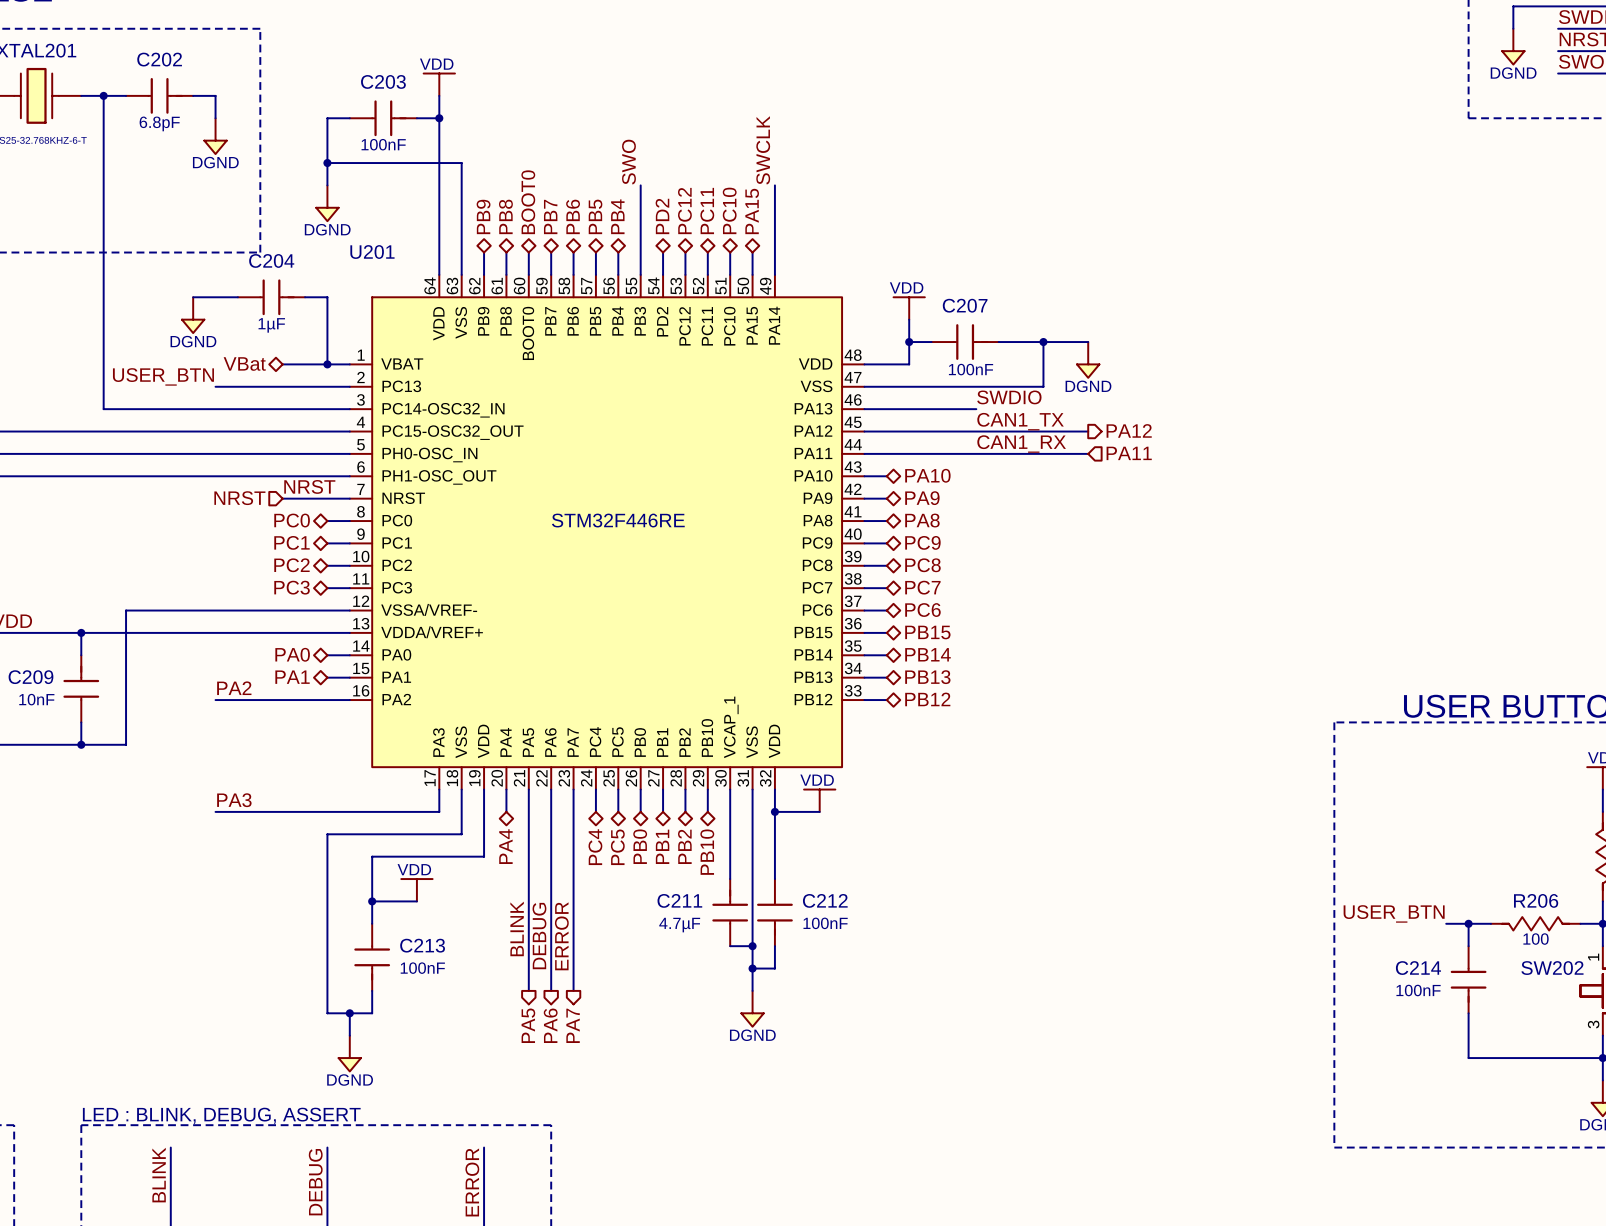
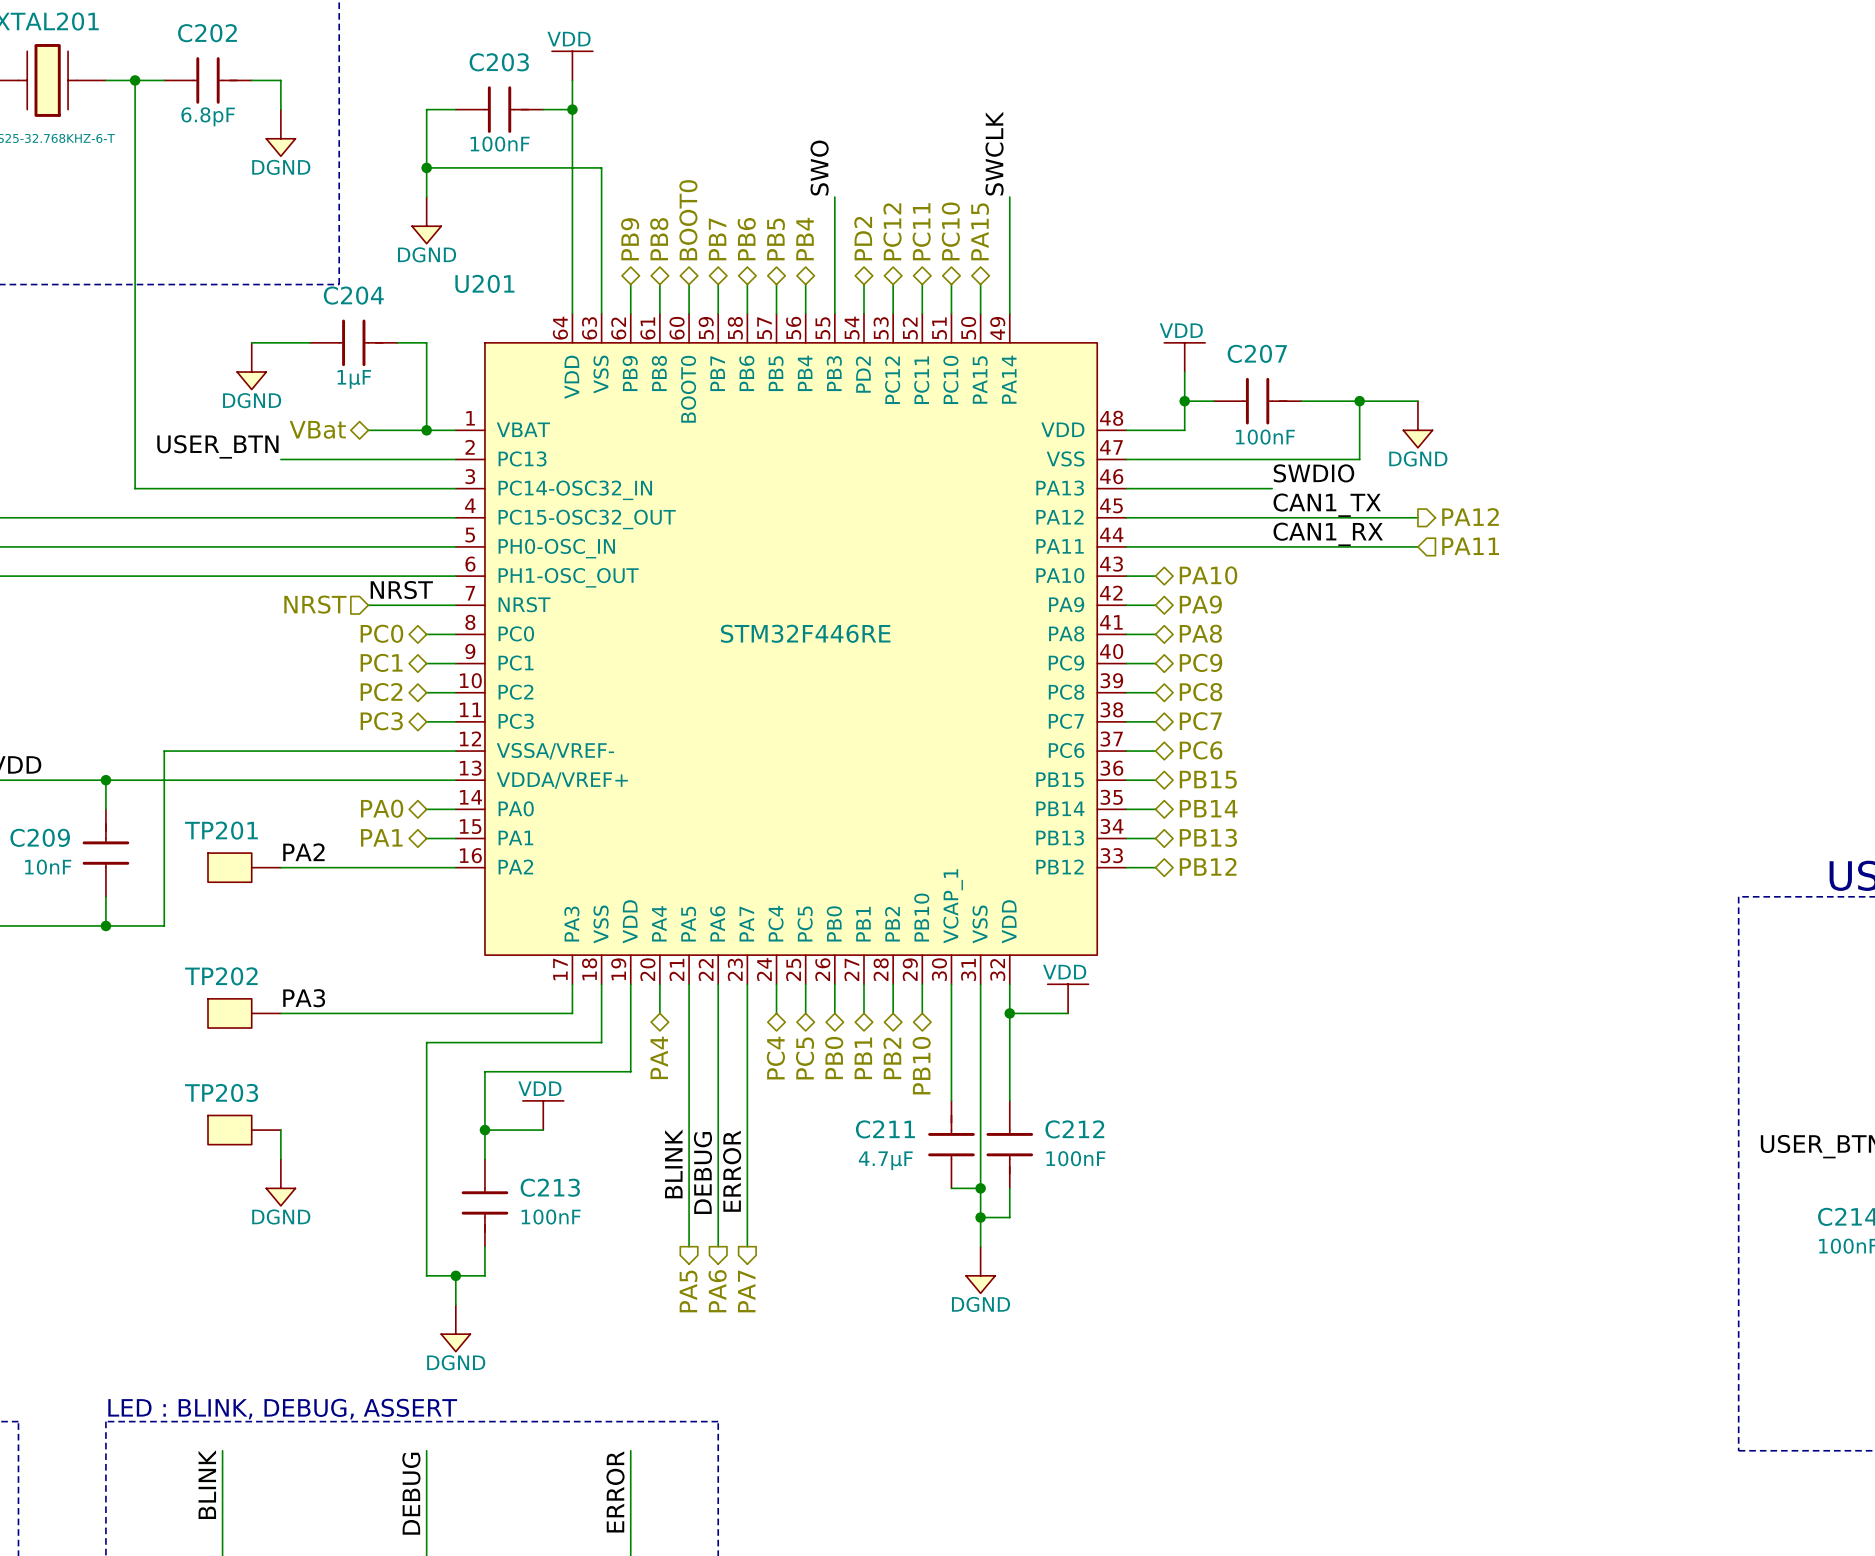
TP201: none -> (244, 867)
TP202: none -> (244, 1013)
TP203: none -> (244, 1130)
wire: none -> (280, 1130) (280, 1159)
power symbol: none -> DGND (280, 1182)

